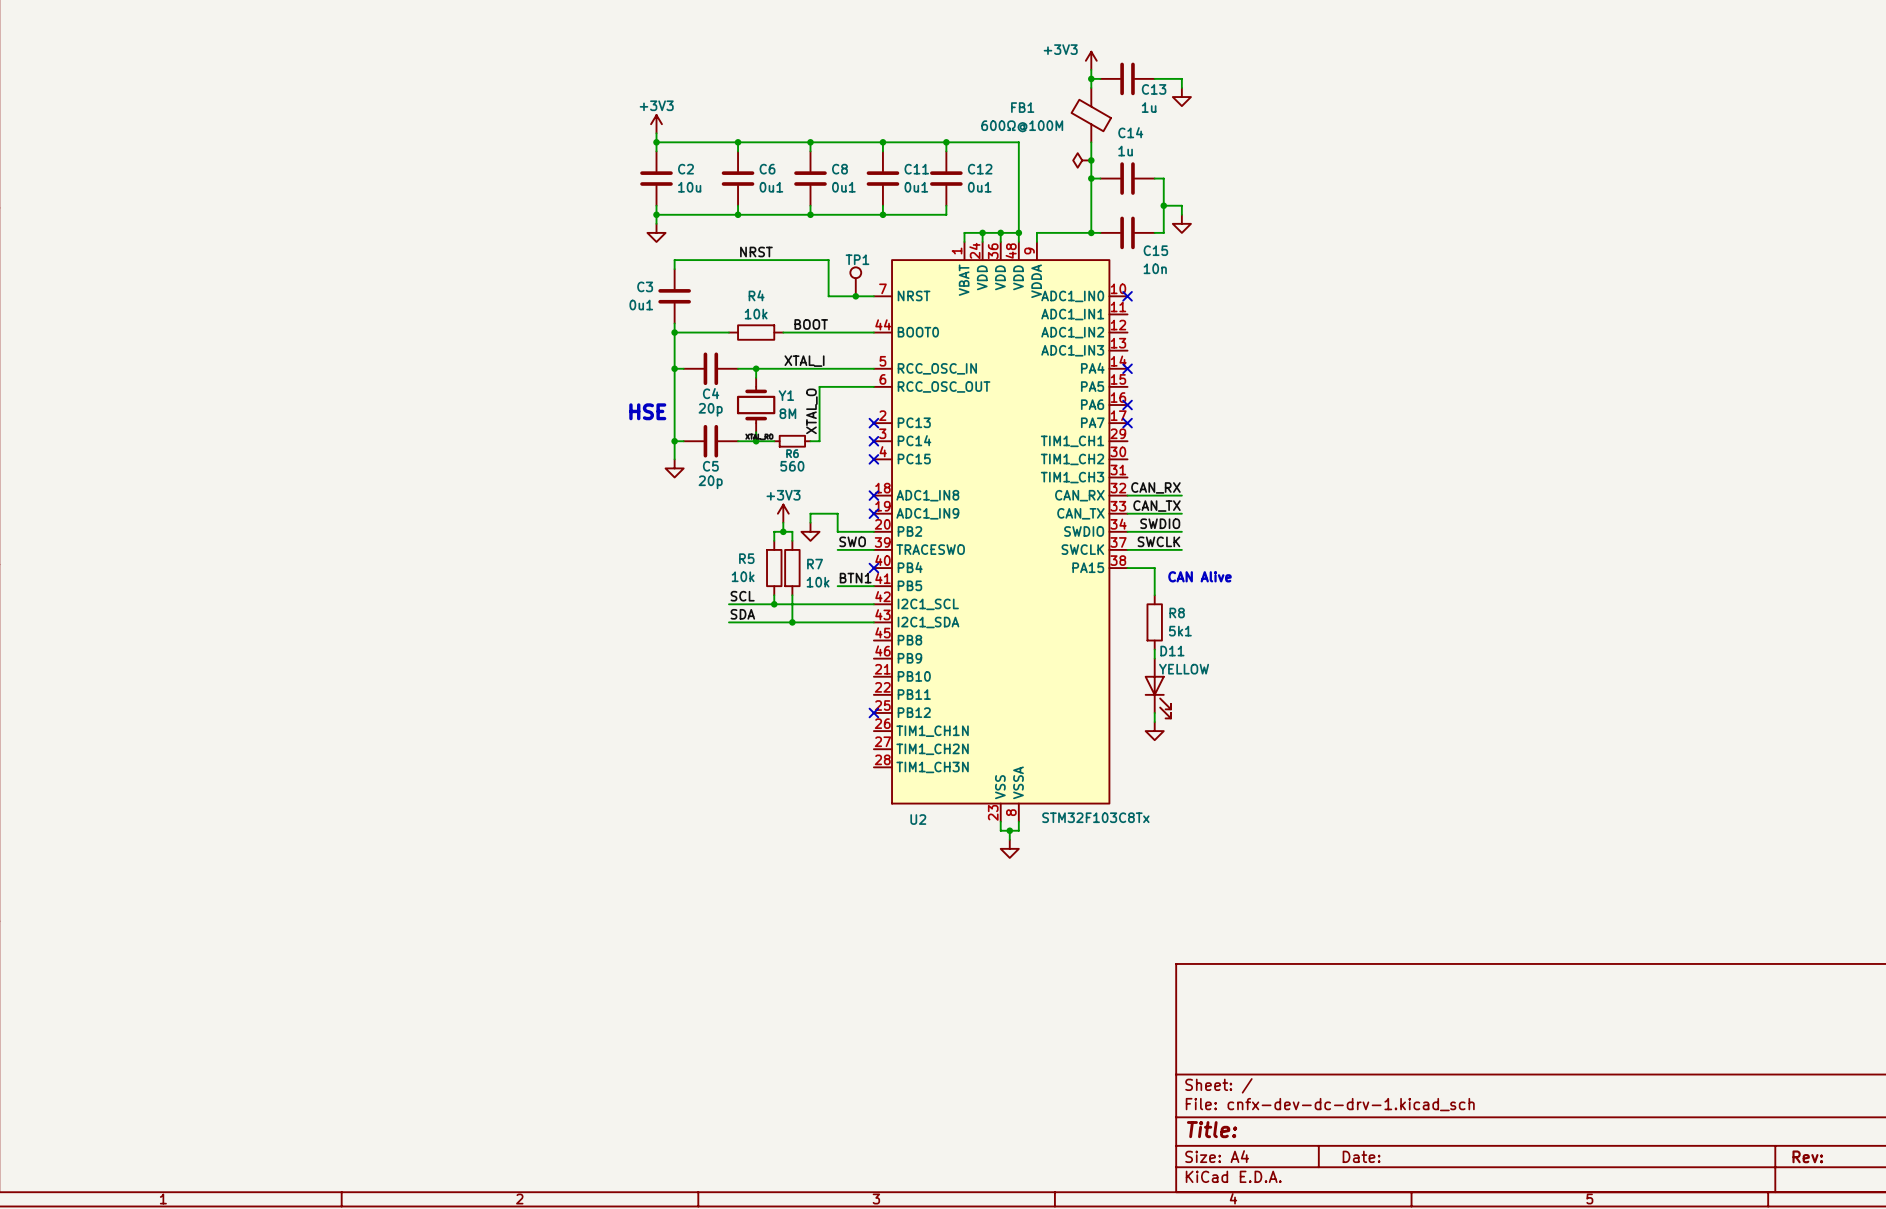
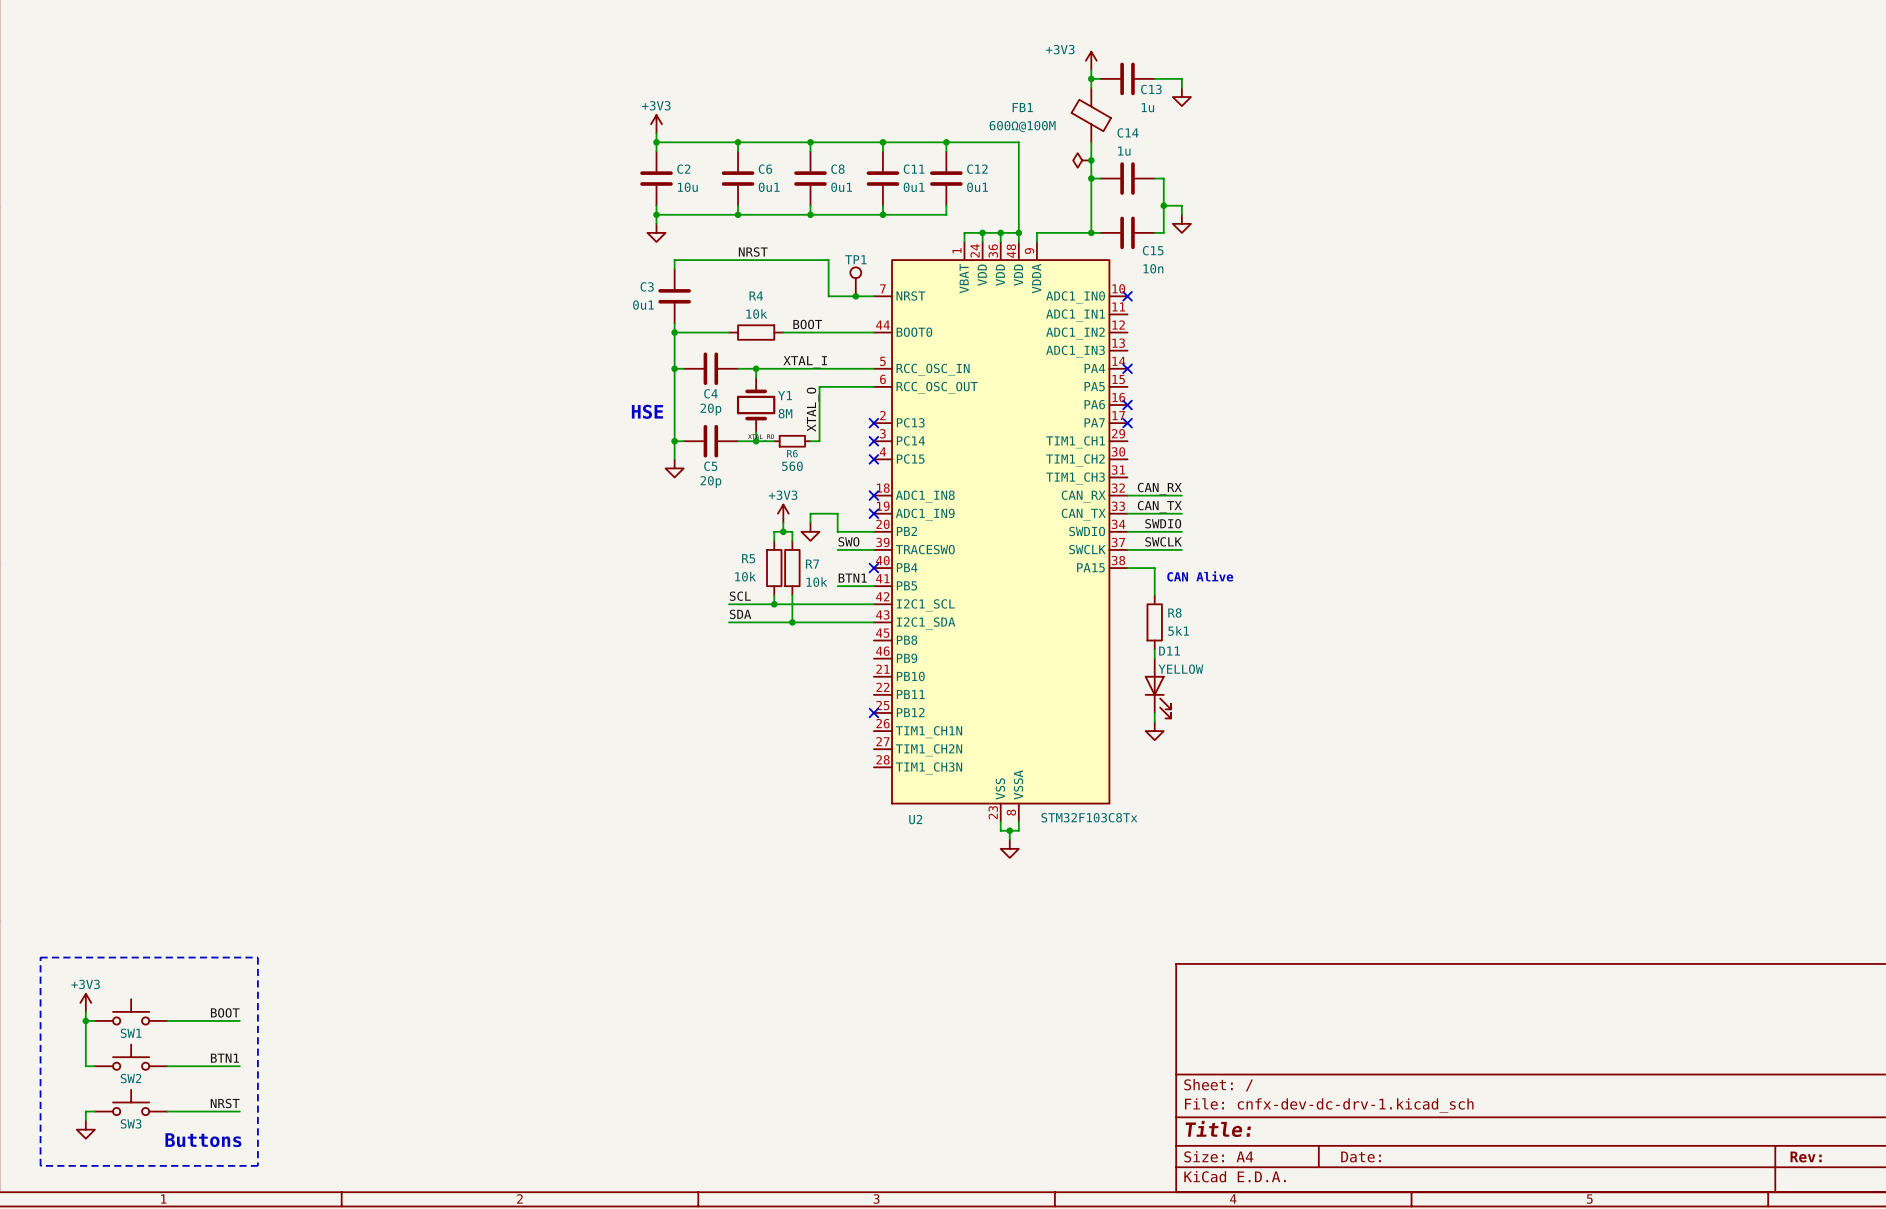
line: none -> (40, 957) (257, 957) (257, 1165) (40, 1165) (40, 957)
power symbol: none -> +3V3 (85, 1002)
wire: none -> (85, 1011) (85, 1066) (94, 1066)
SW1: none -> (131, 1011)
label: none -> BOOT (225, 1012)
wire: none -> (85, 1020) (94, 1020)
junction: none -> (85, 1020)
wire: none -> (167, 1020) (239, 1020)
SW2: none -> (131, 1057)
label: none -> BTN1 (224, 1058)
wire: none -> (167, 1066) (239, 1066)
SW3: none -> (131, 1102)
label: none -> NRST (225, 1103)
wire: none -> (94, 1111) (85, 1111) (85, 1120)
wire: none -> (167, 1111) (239, 1111)
power symbol: none -> (85, 1129)
text: none -> Buttons (203, 1140)

